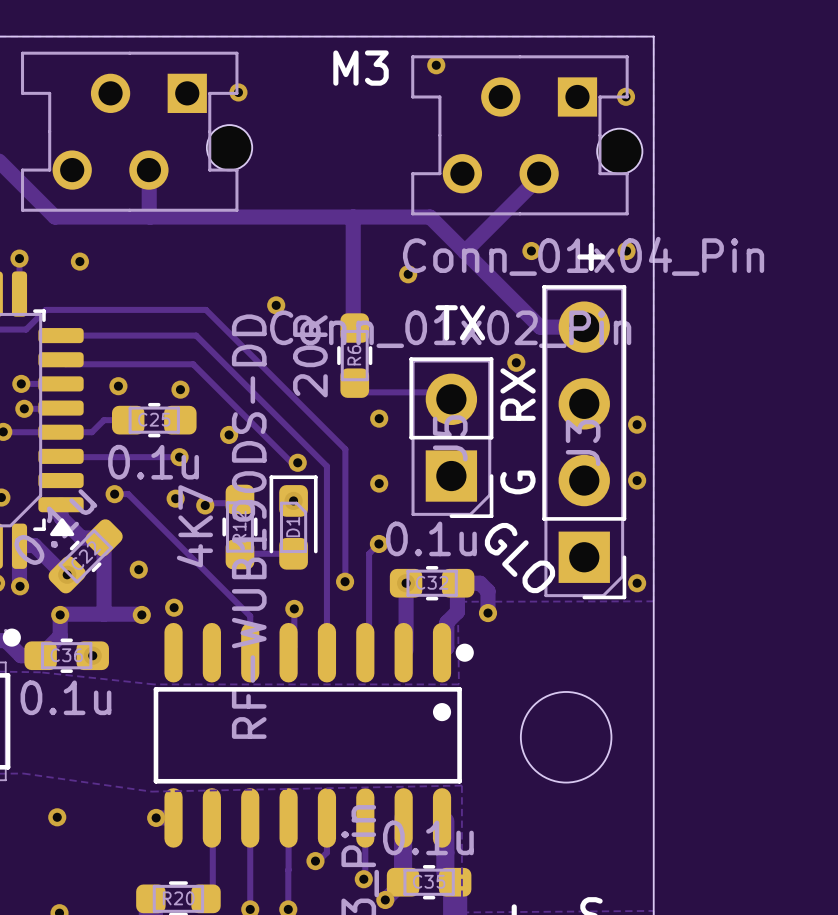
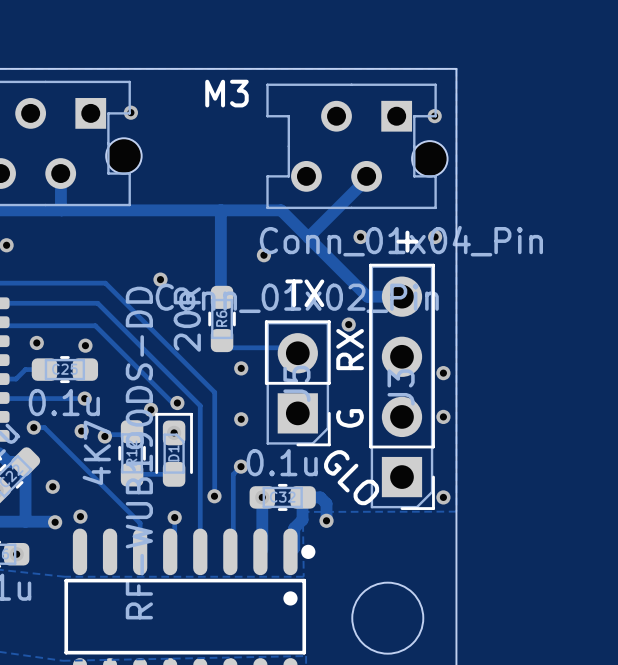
via: (436, 65) -> none
via position: (229, 434) -> (151, 409)

